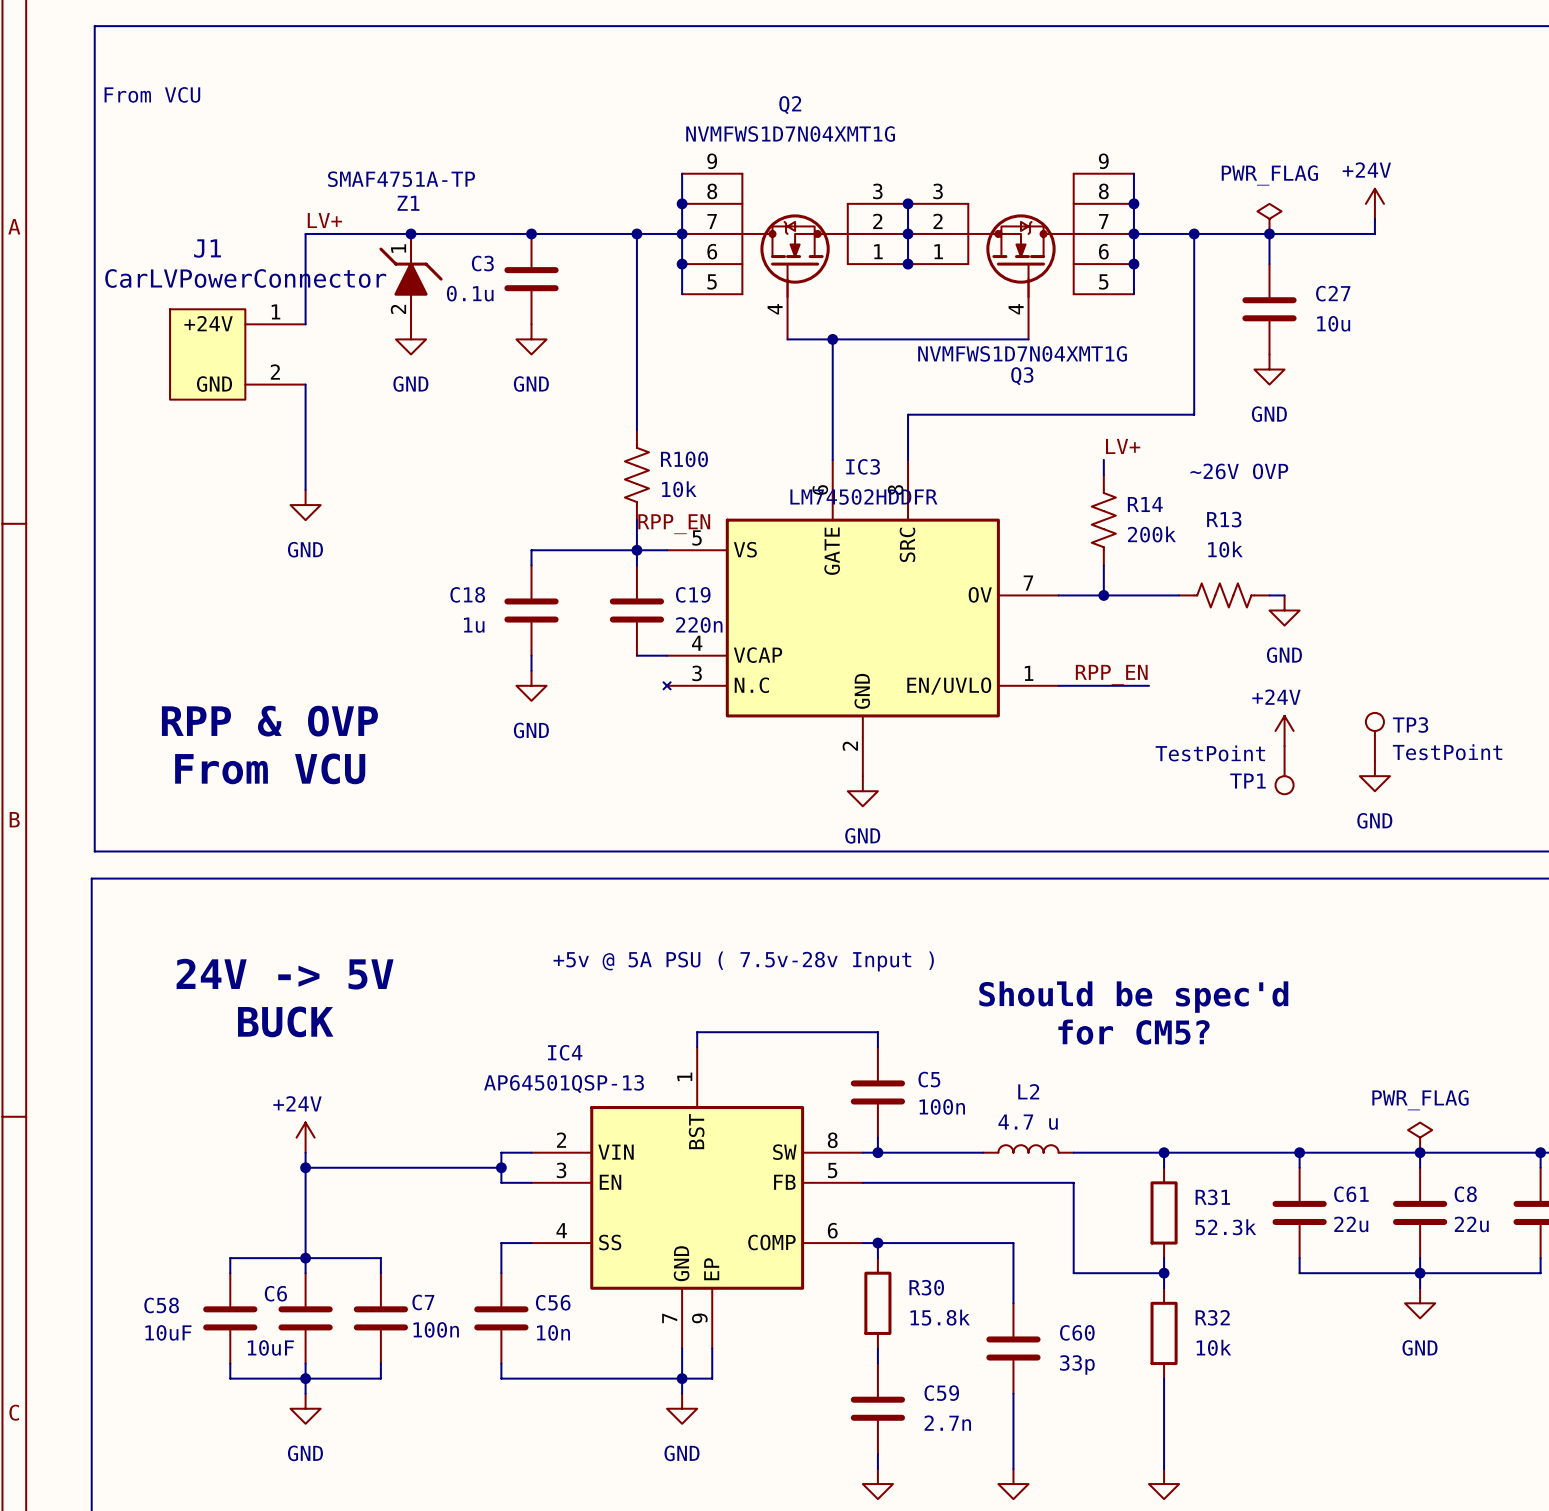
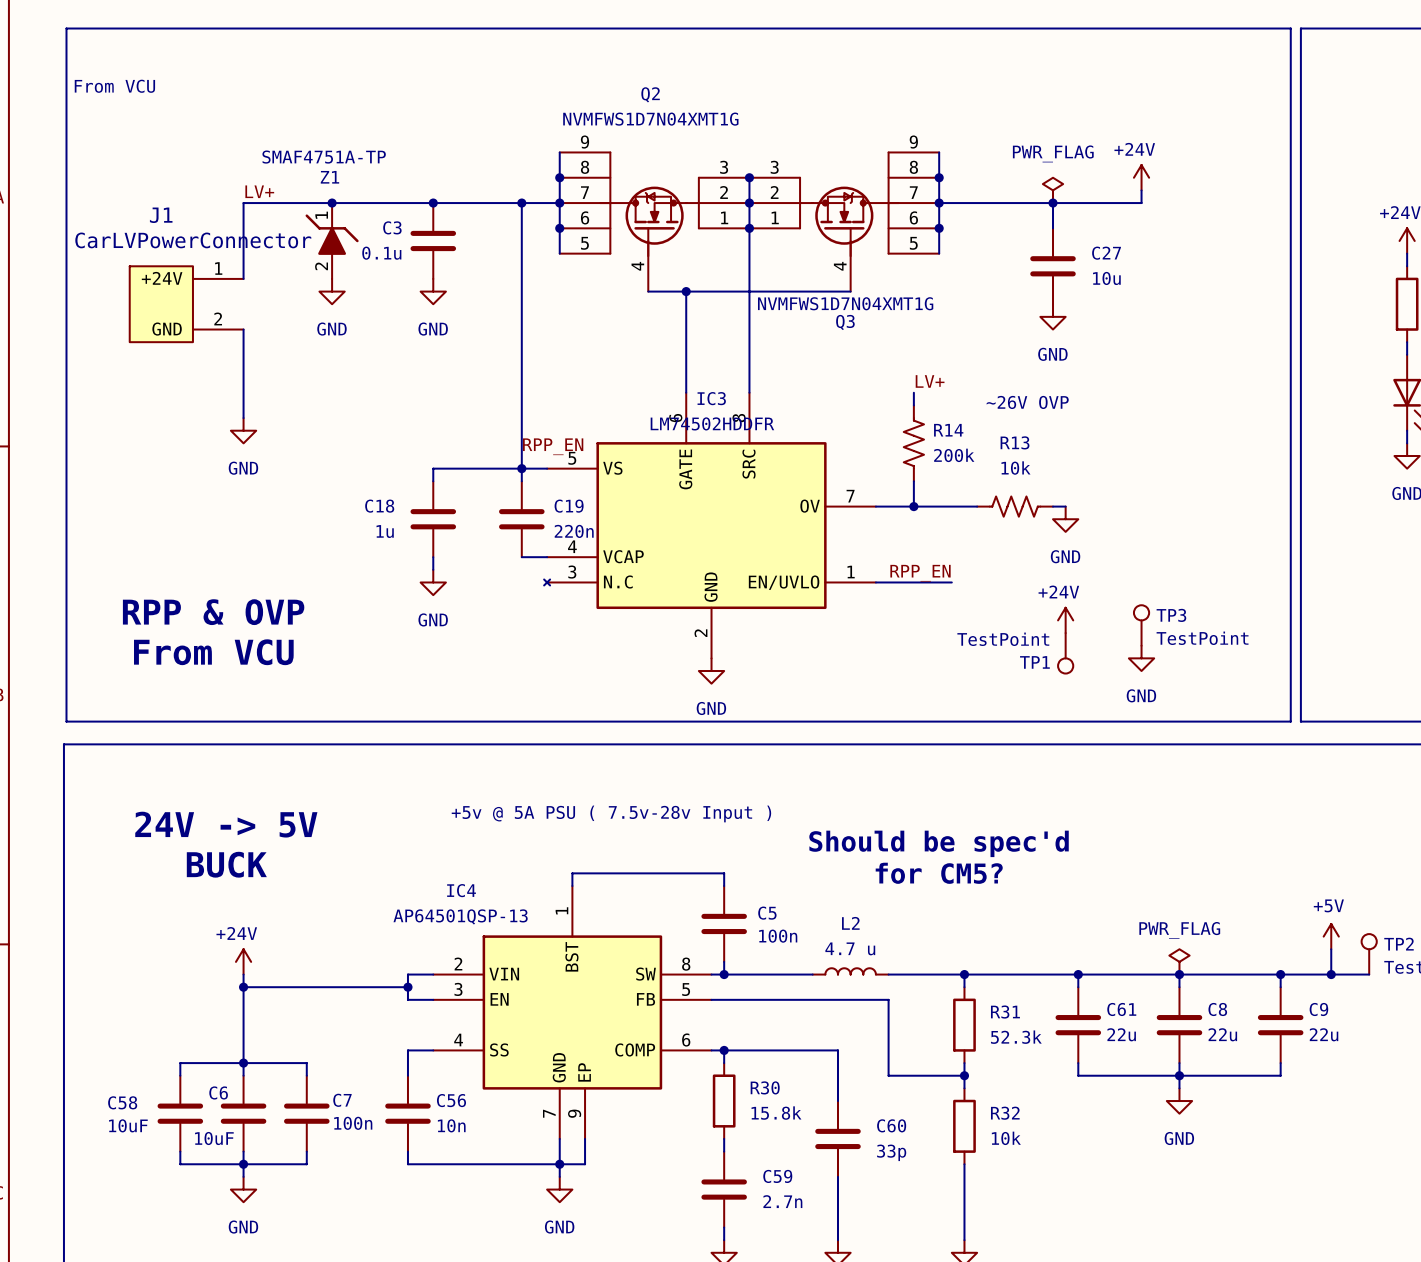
wire: (1194, 233) (1194, 414) (908, 414) -> (749, 228) (749, 354)
junction: (1194, 233) -> none
R100: 10k (636, 474) -> none

